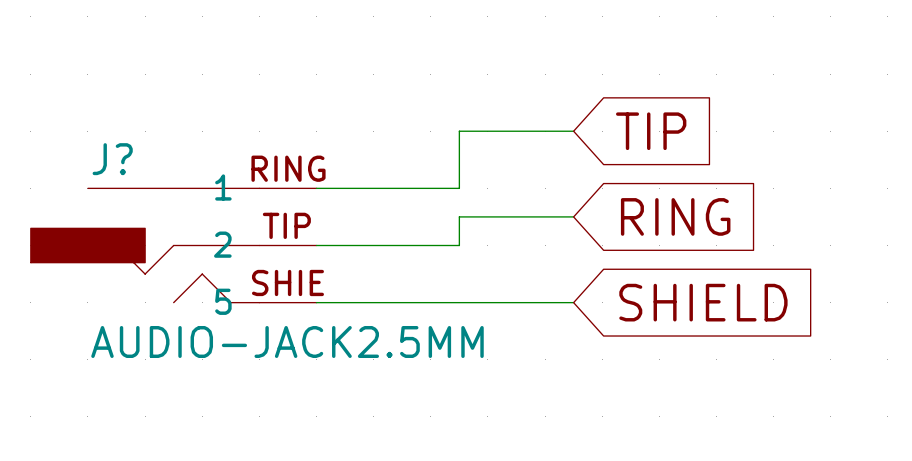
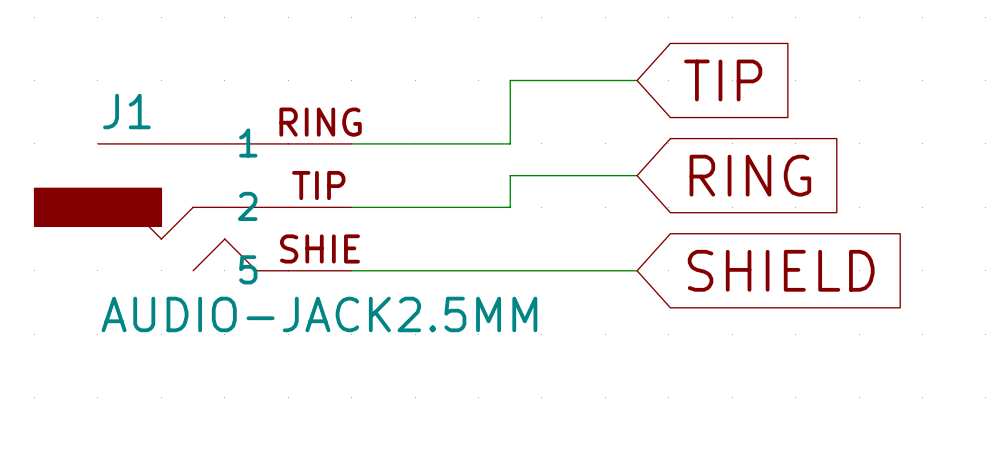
J? name: J? (112, 159) -> J1 (126, 111)

